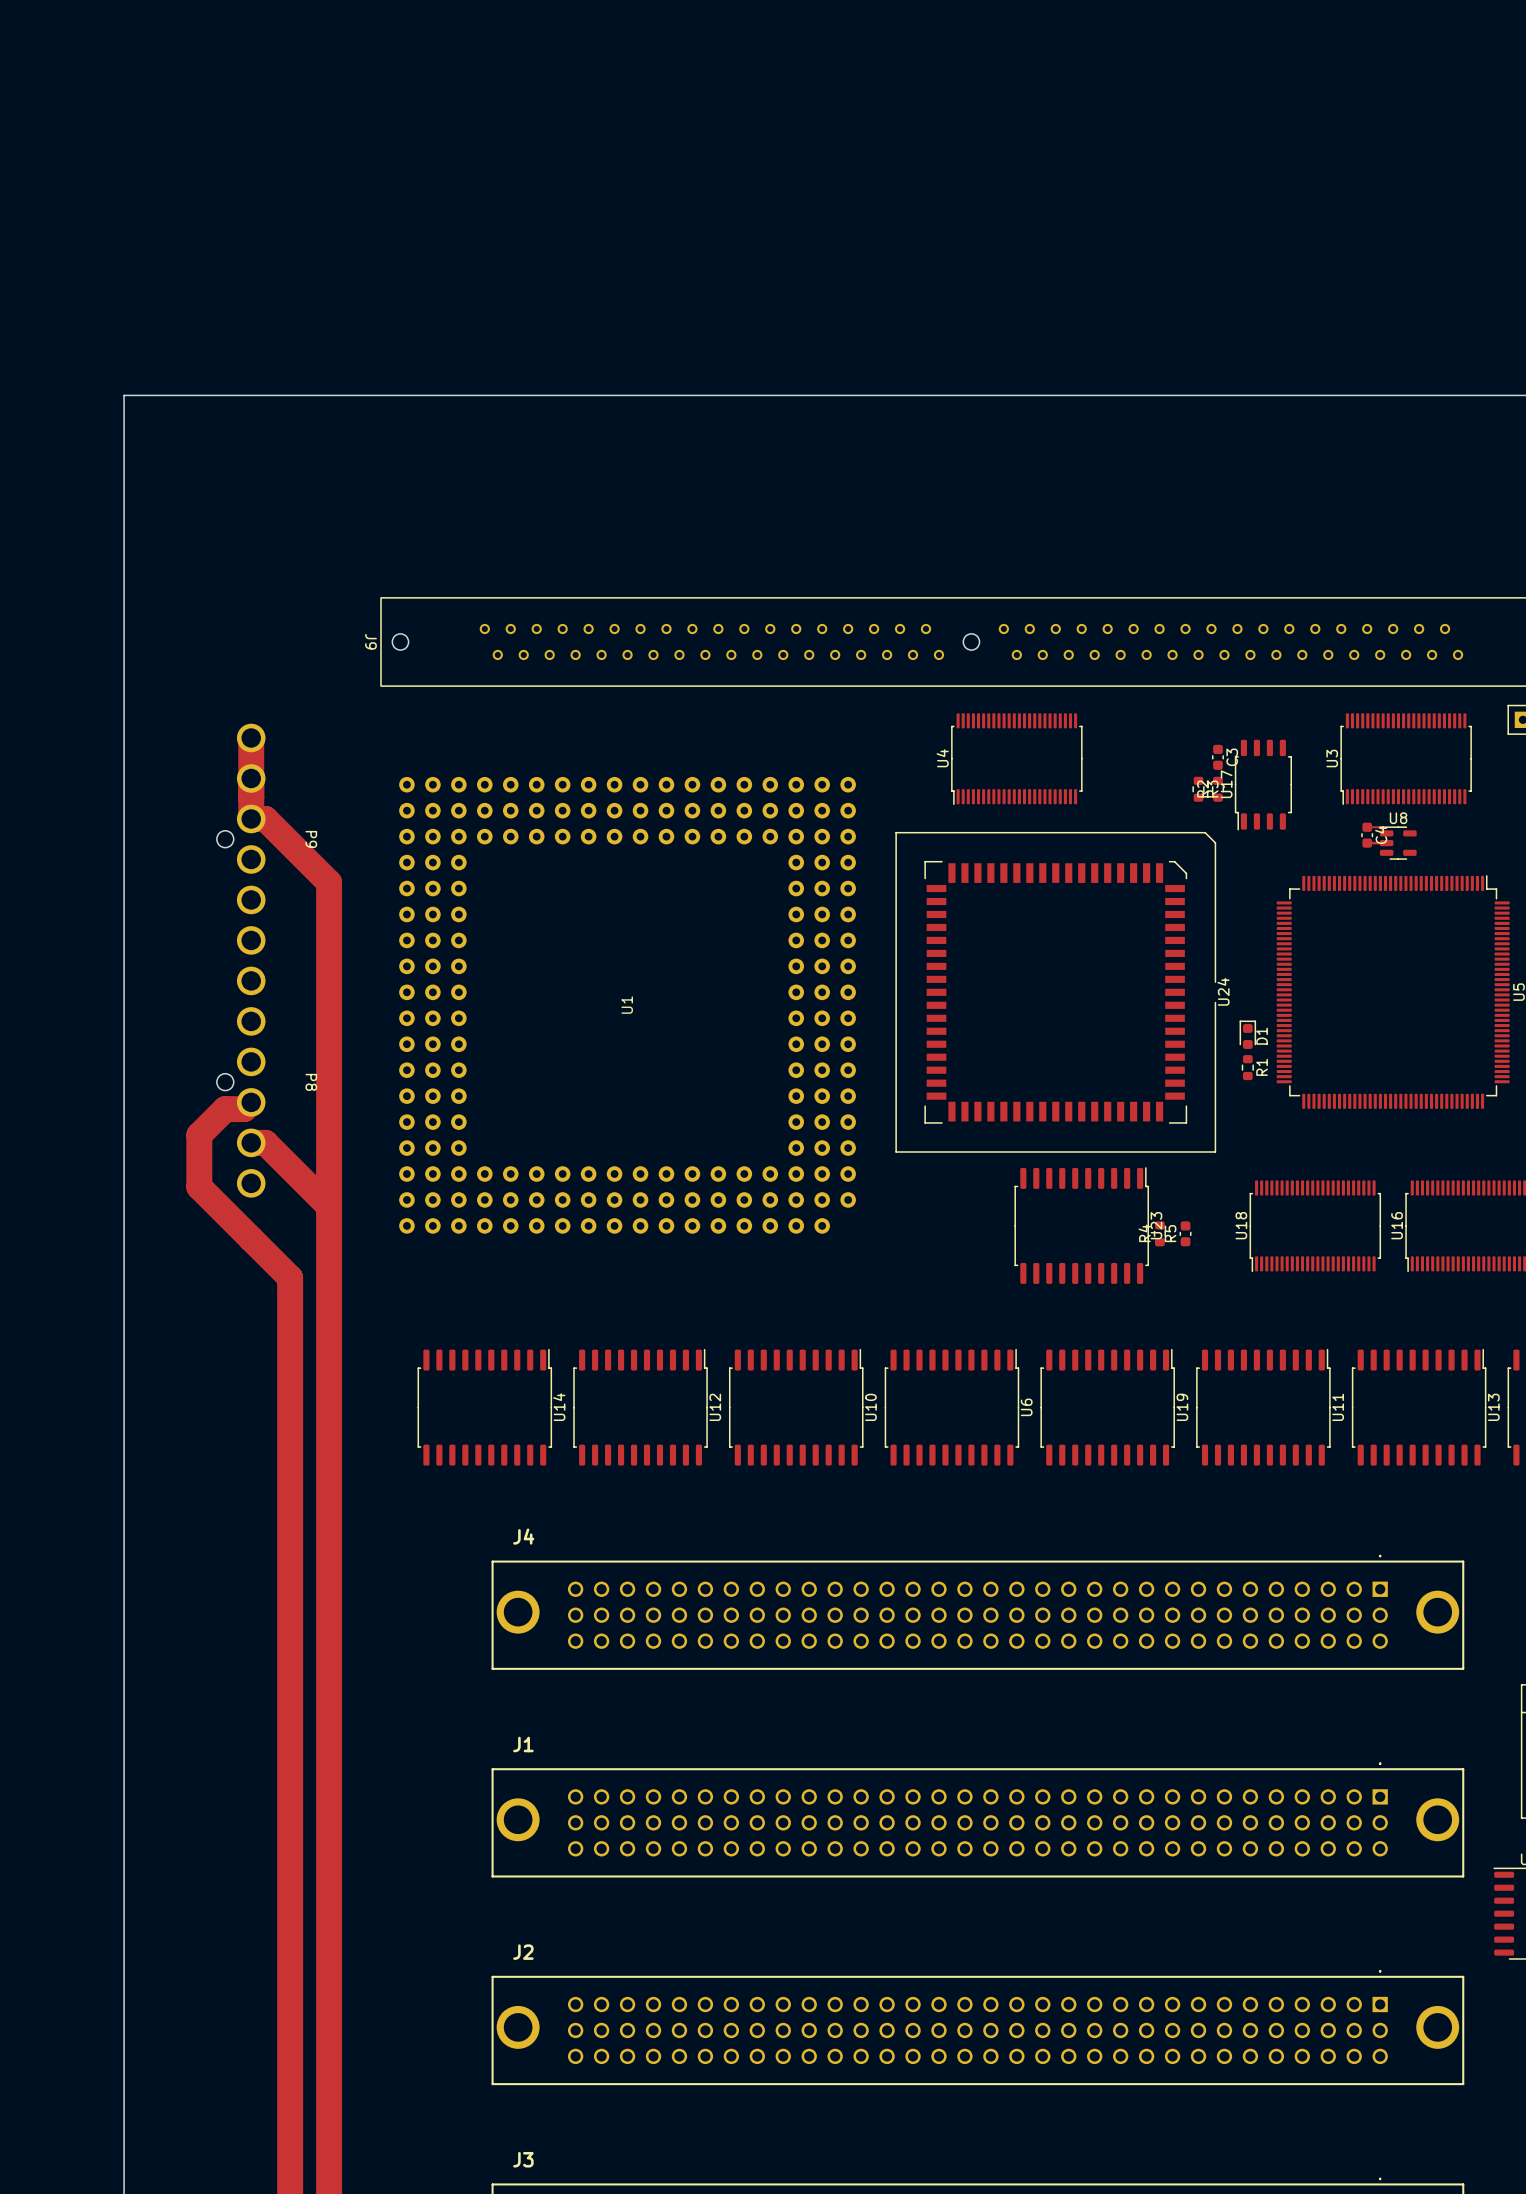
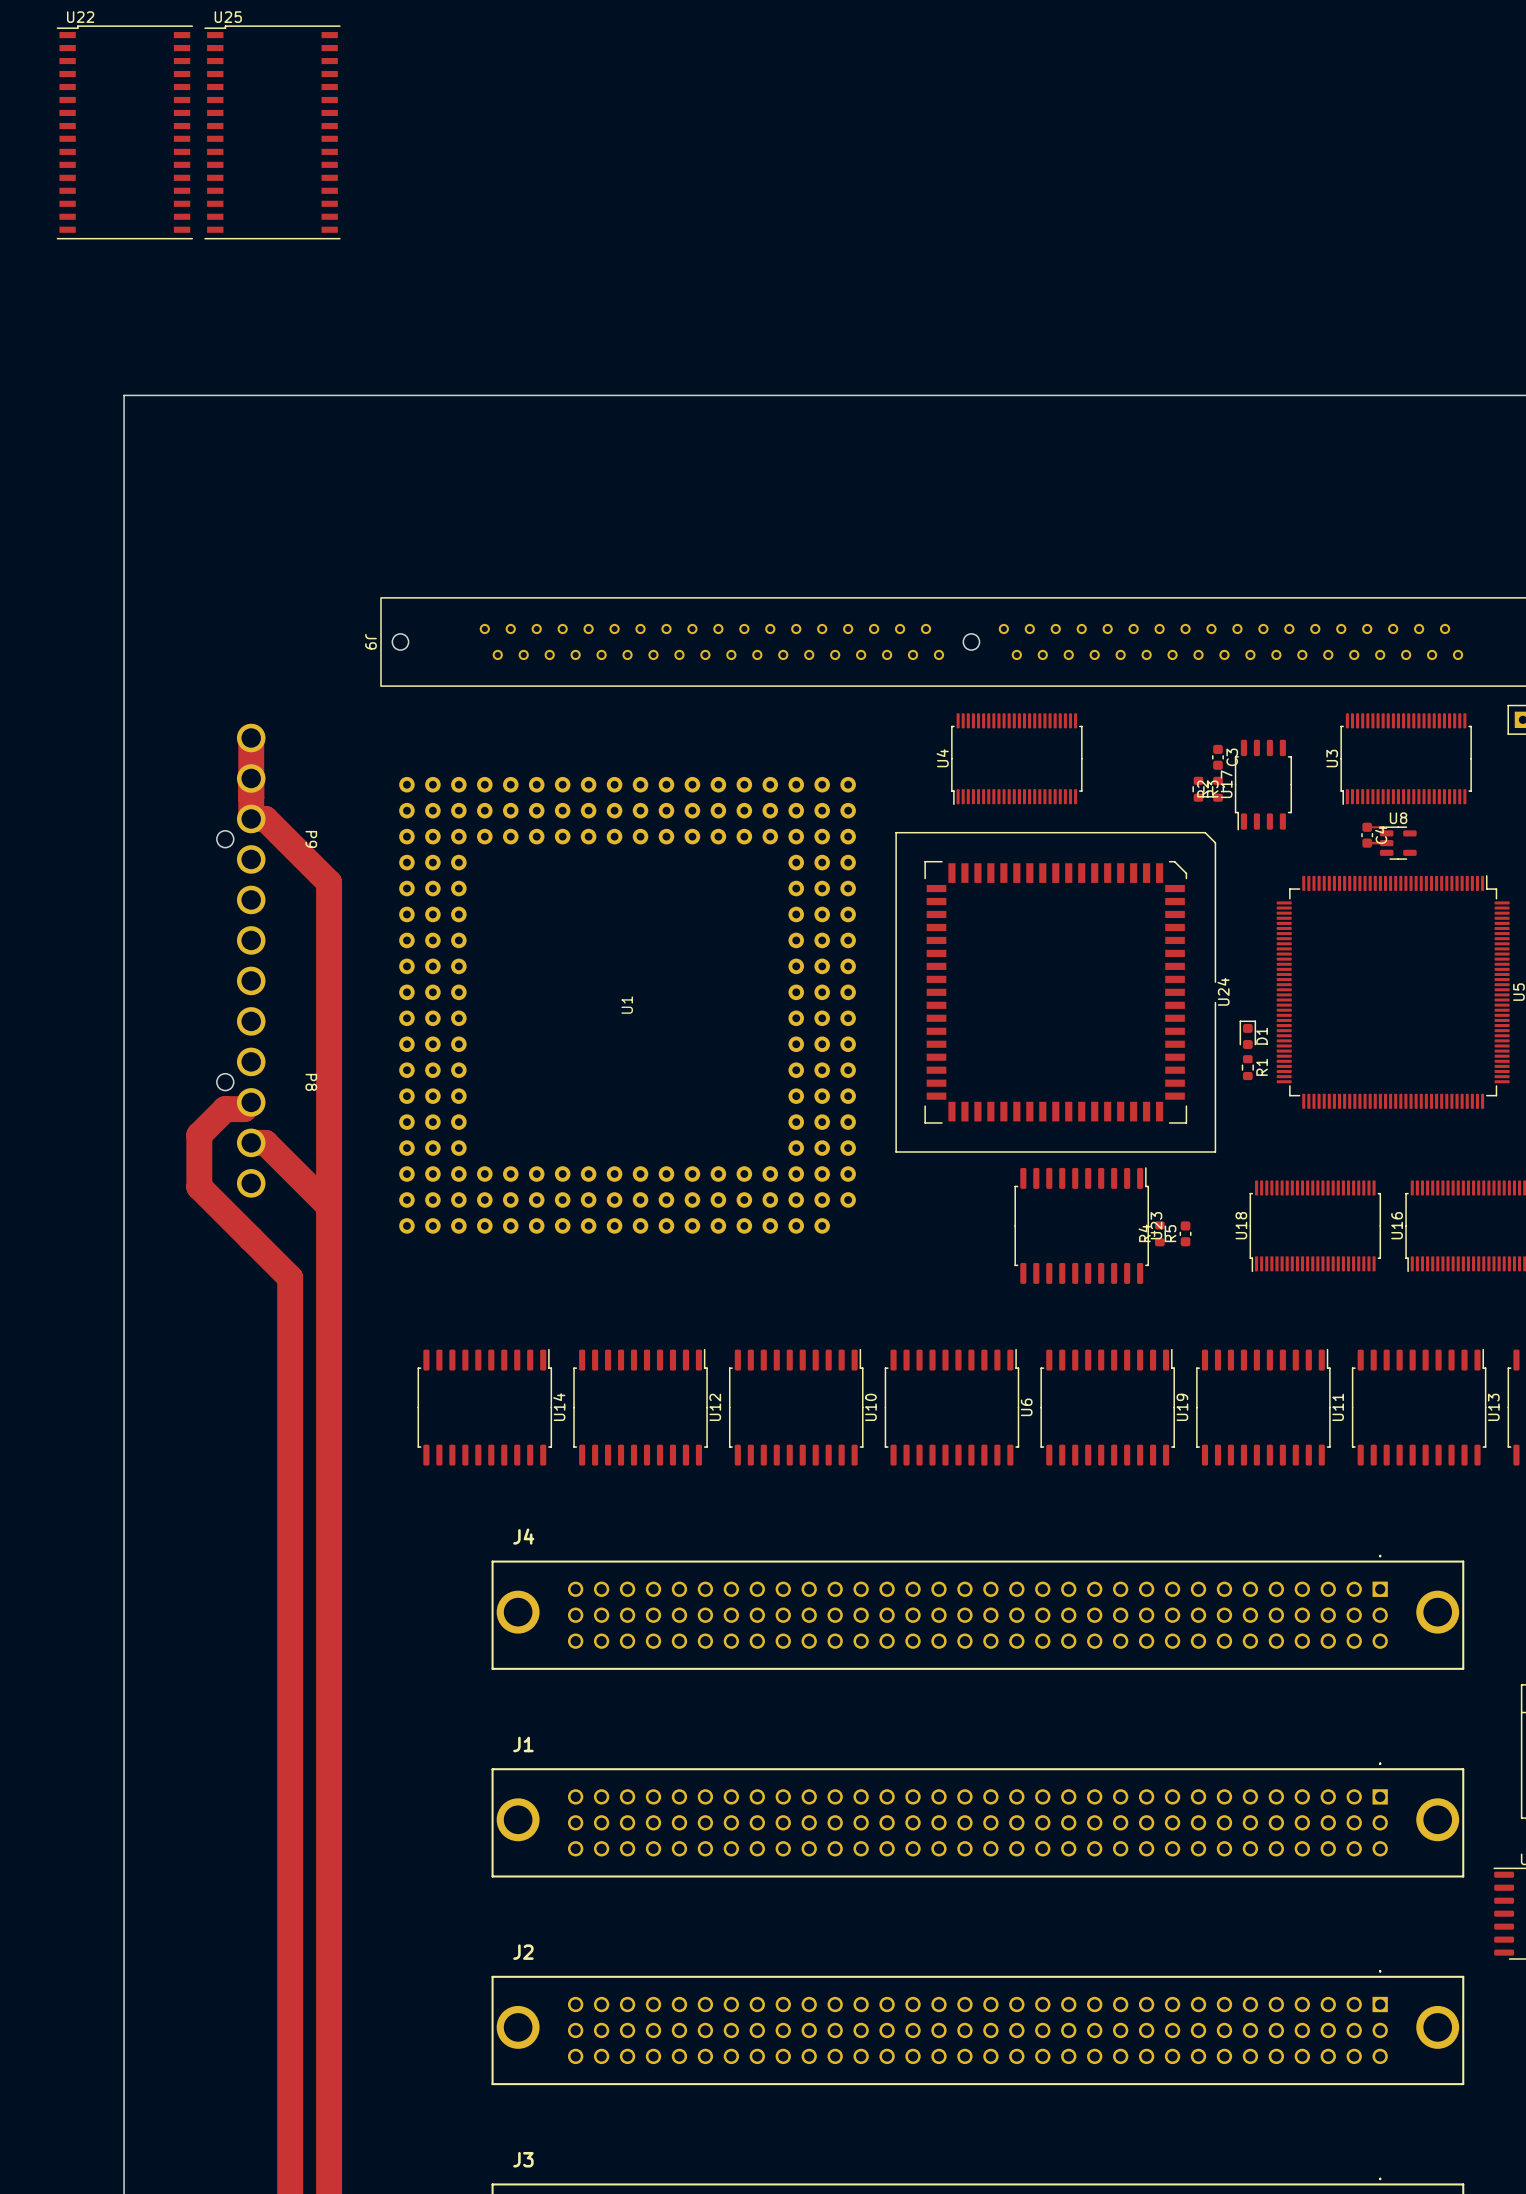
U22: none -> (124, 132)
U25: none -> (272, 132)

